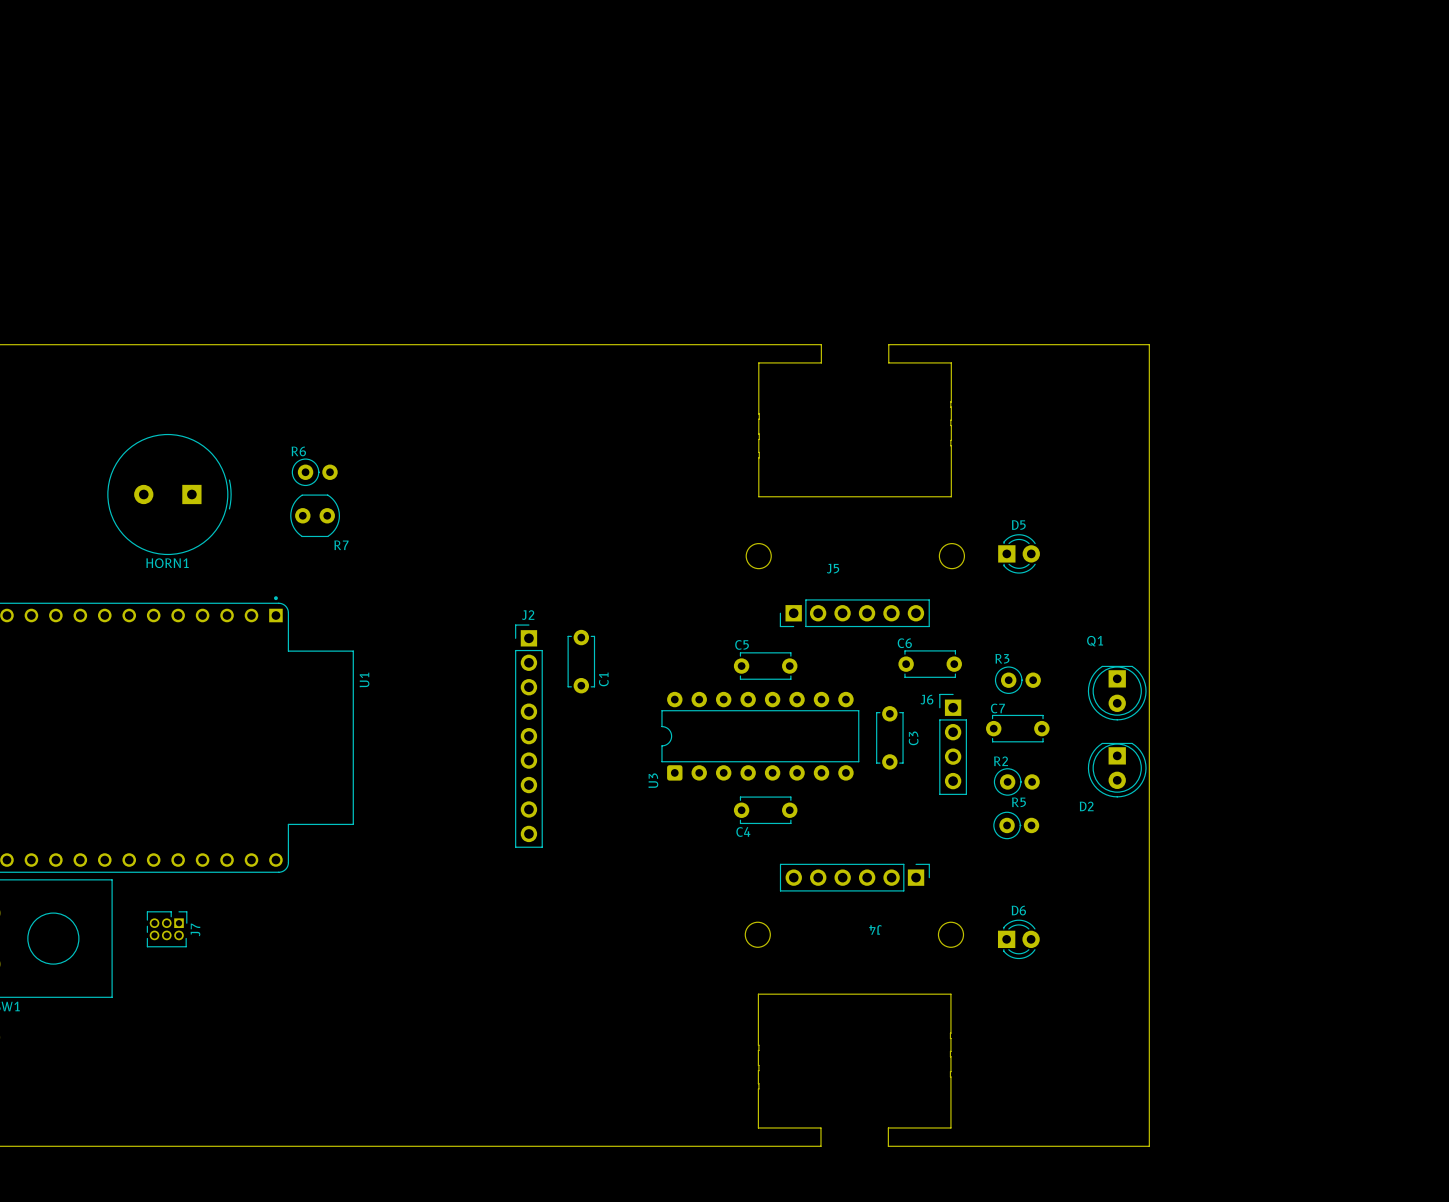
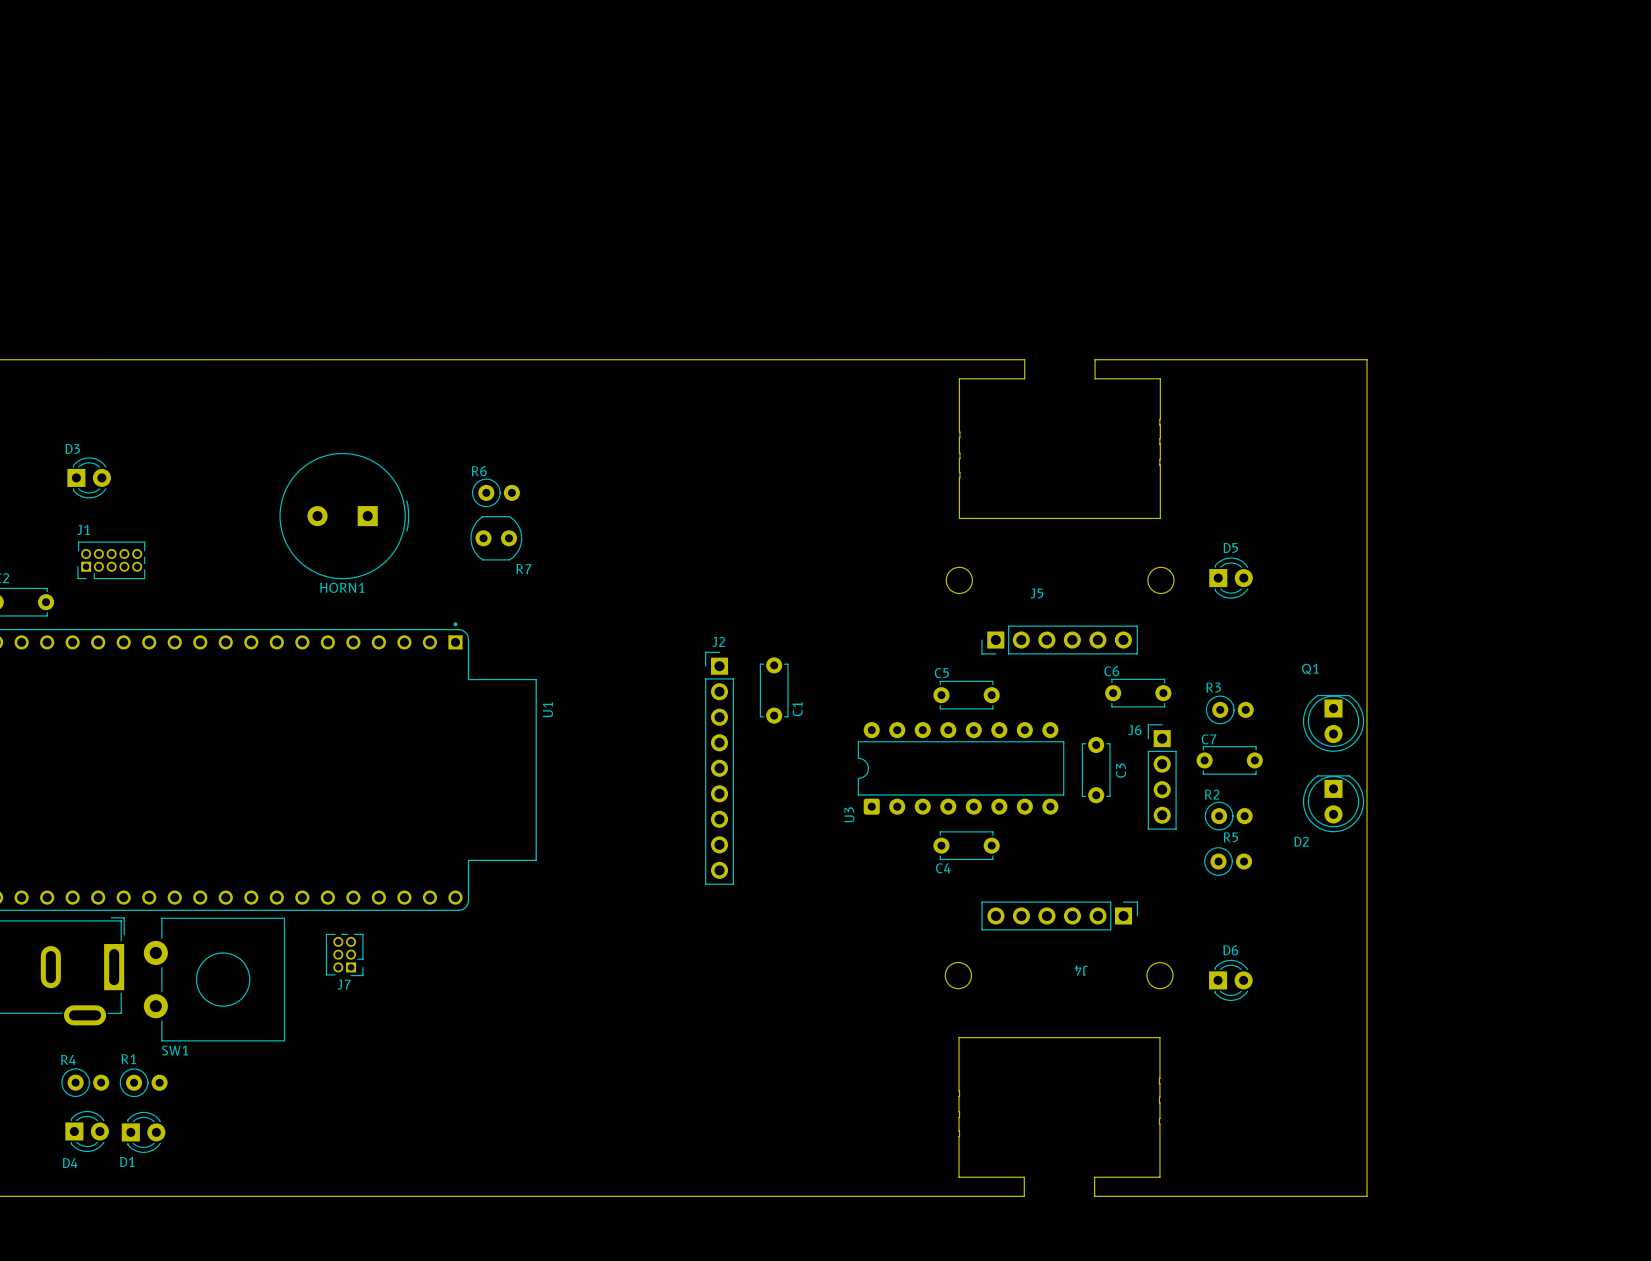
J7 rotation: 0° (167, 929) -> 90° clockwise (344, 954)

